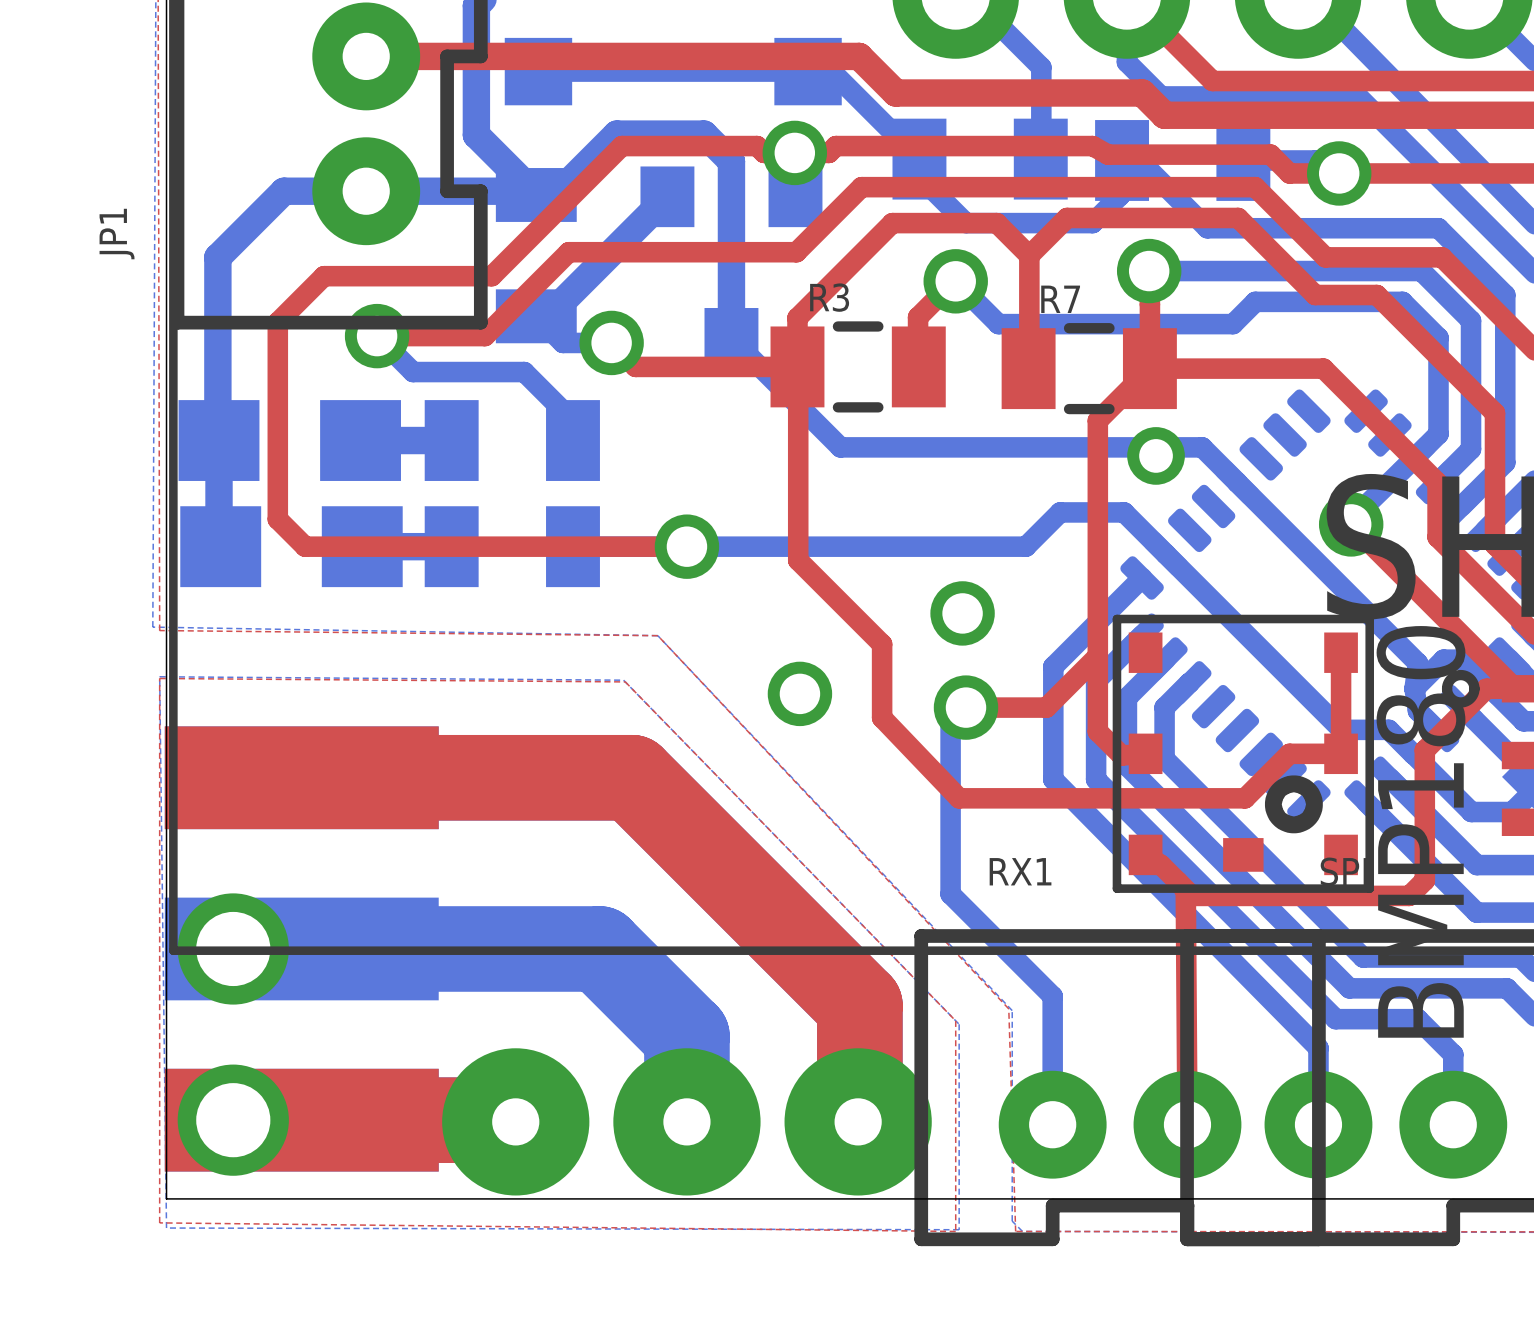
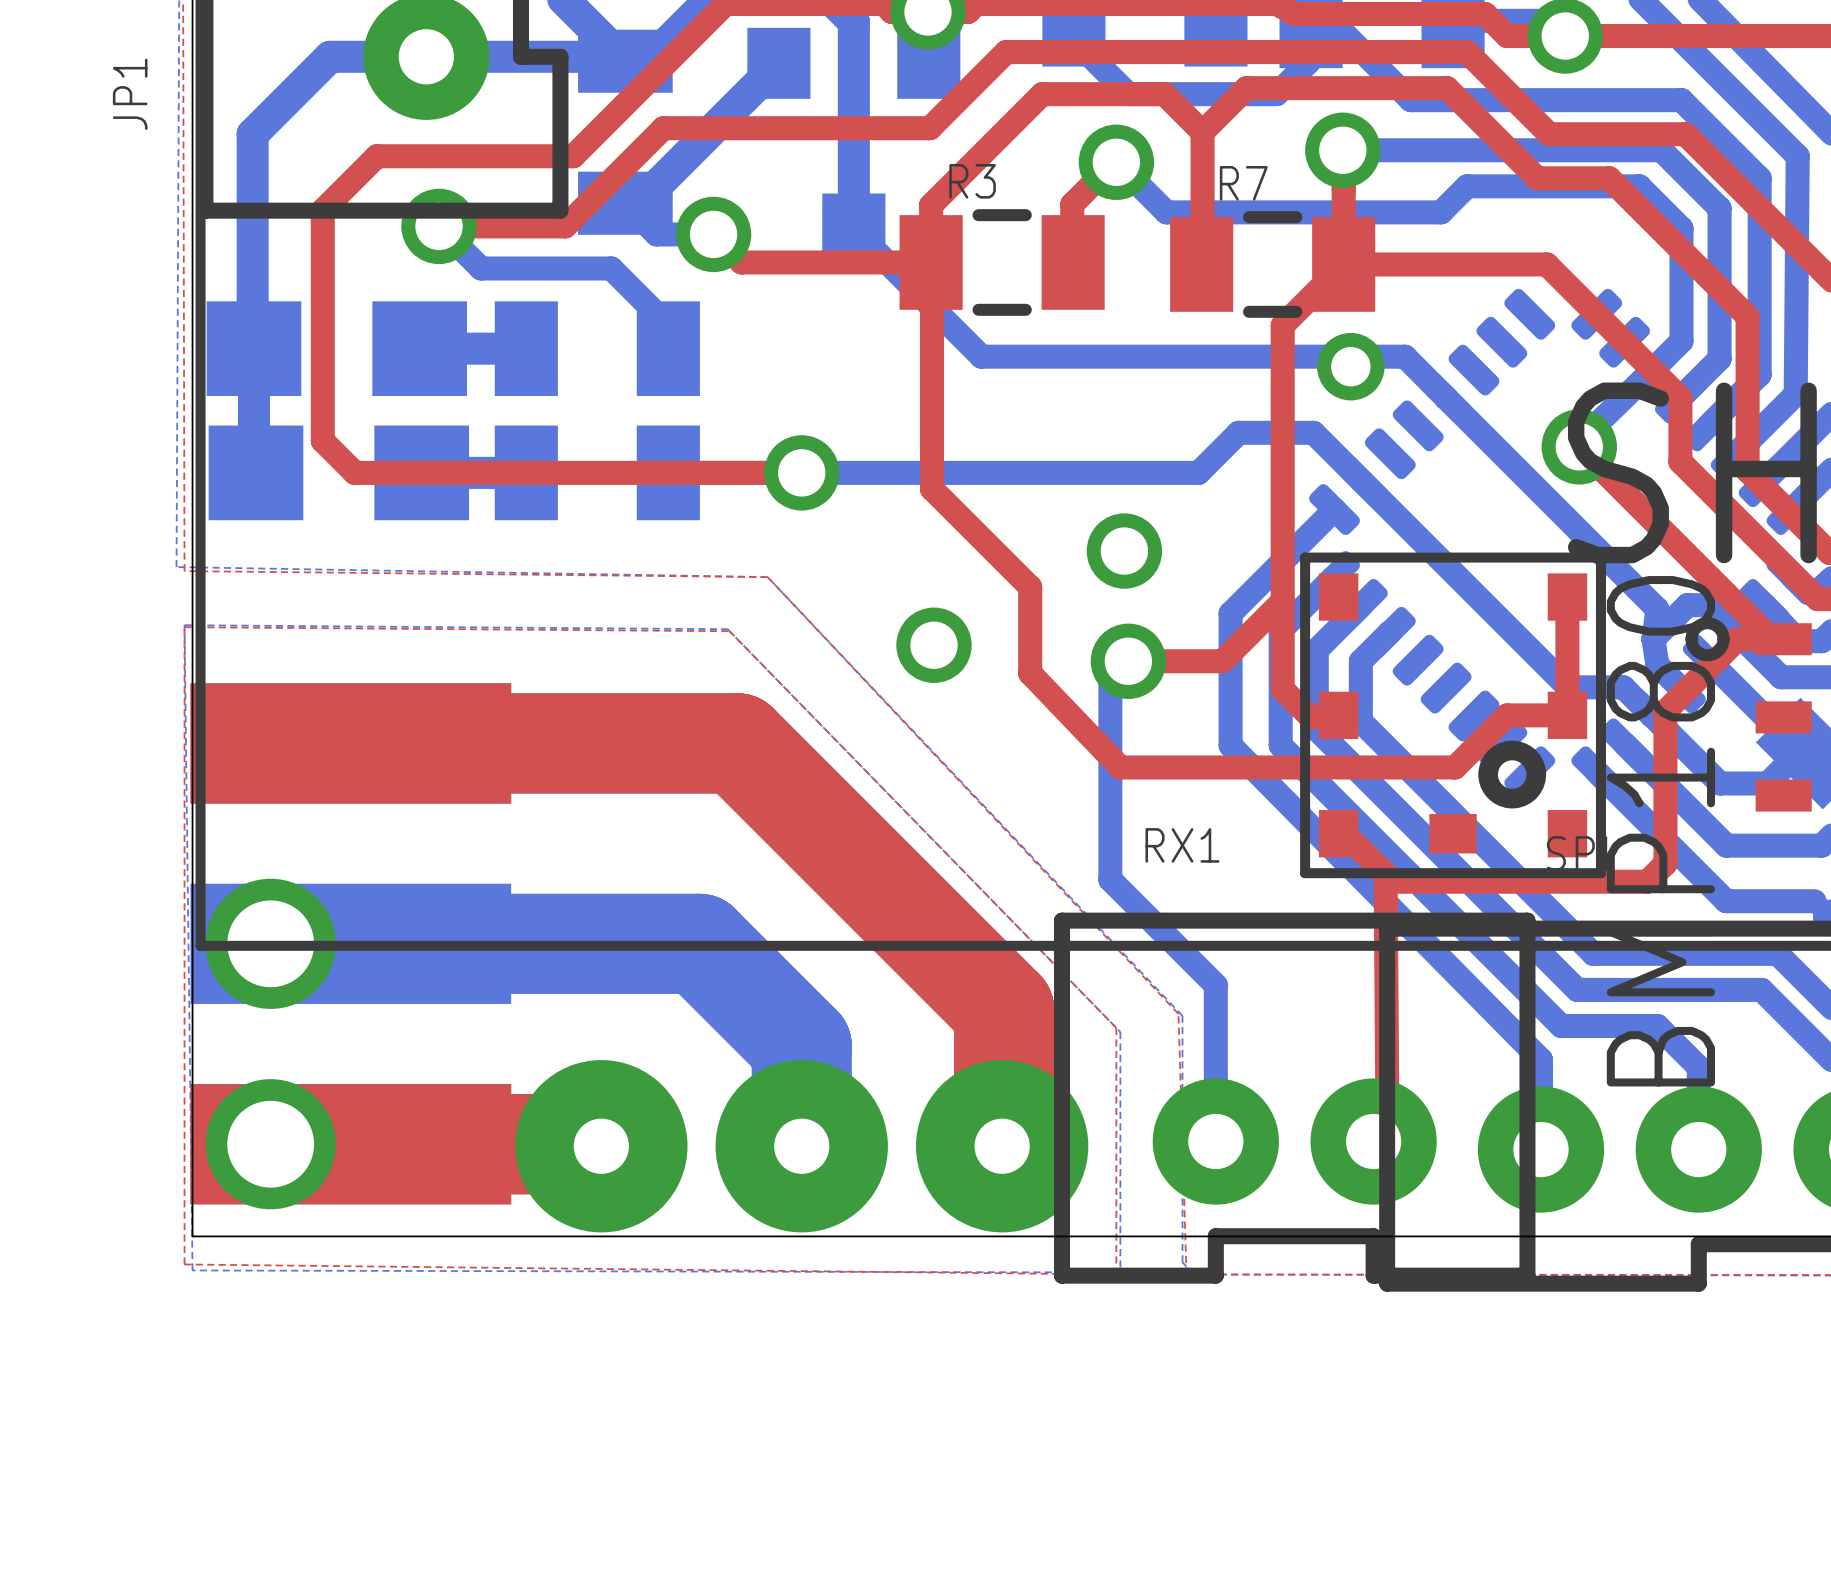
bottom track: (1040, 984) (1052, 996) (1052, 1124) -> (1215, 985) (1215, 1141)
RX1 position: (1120, 1087) -> (1294, 1098)

